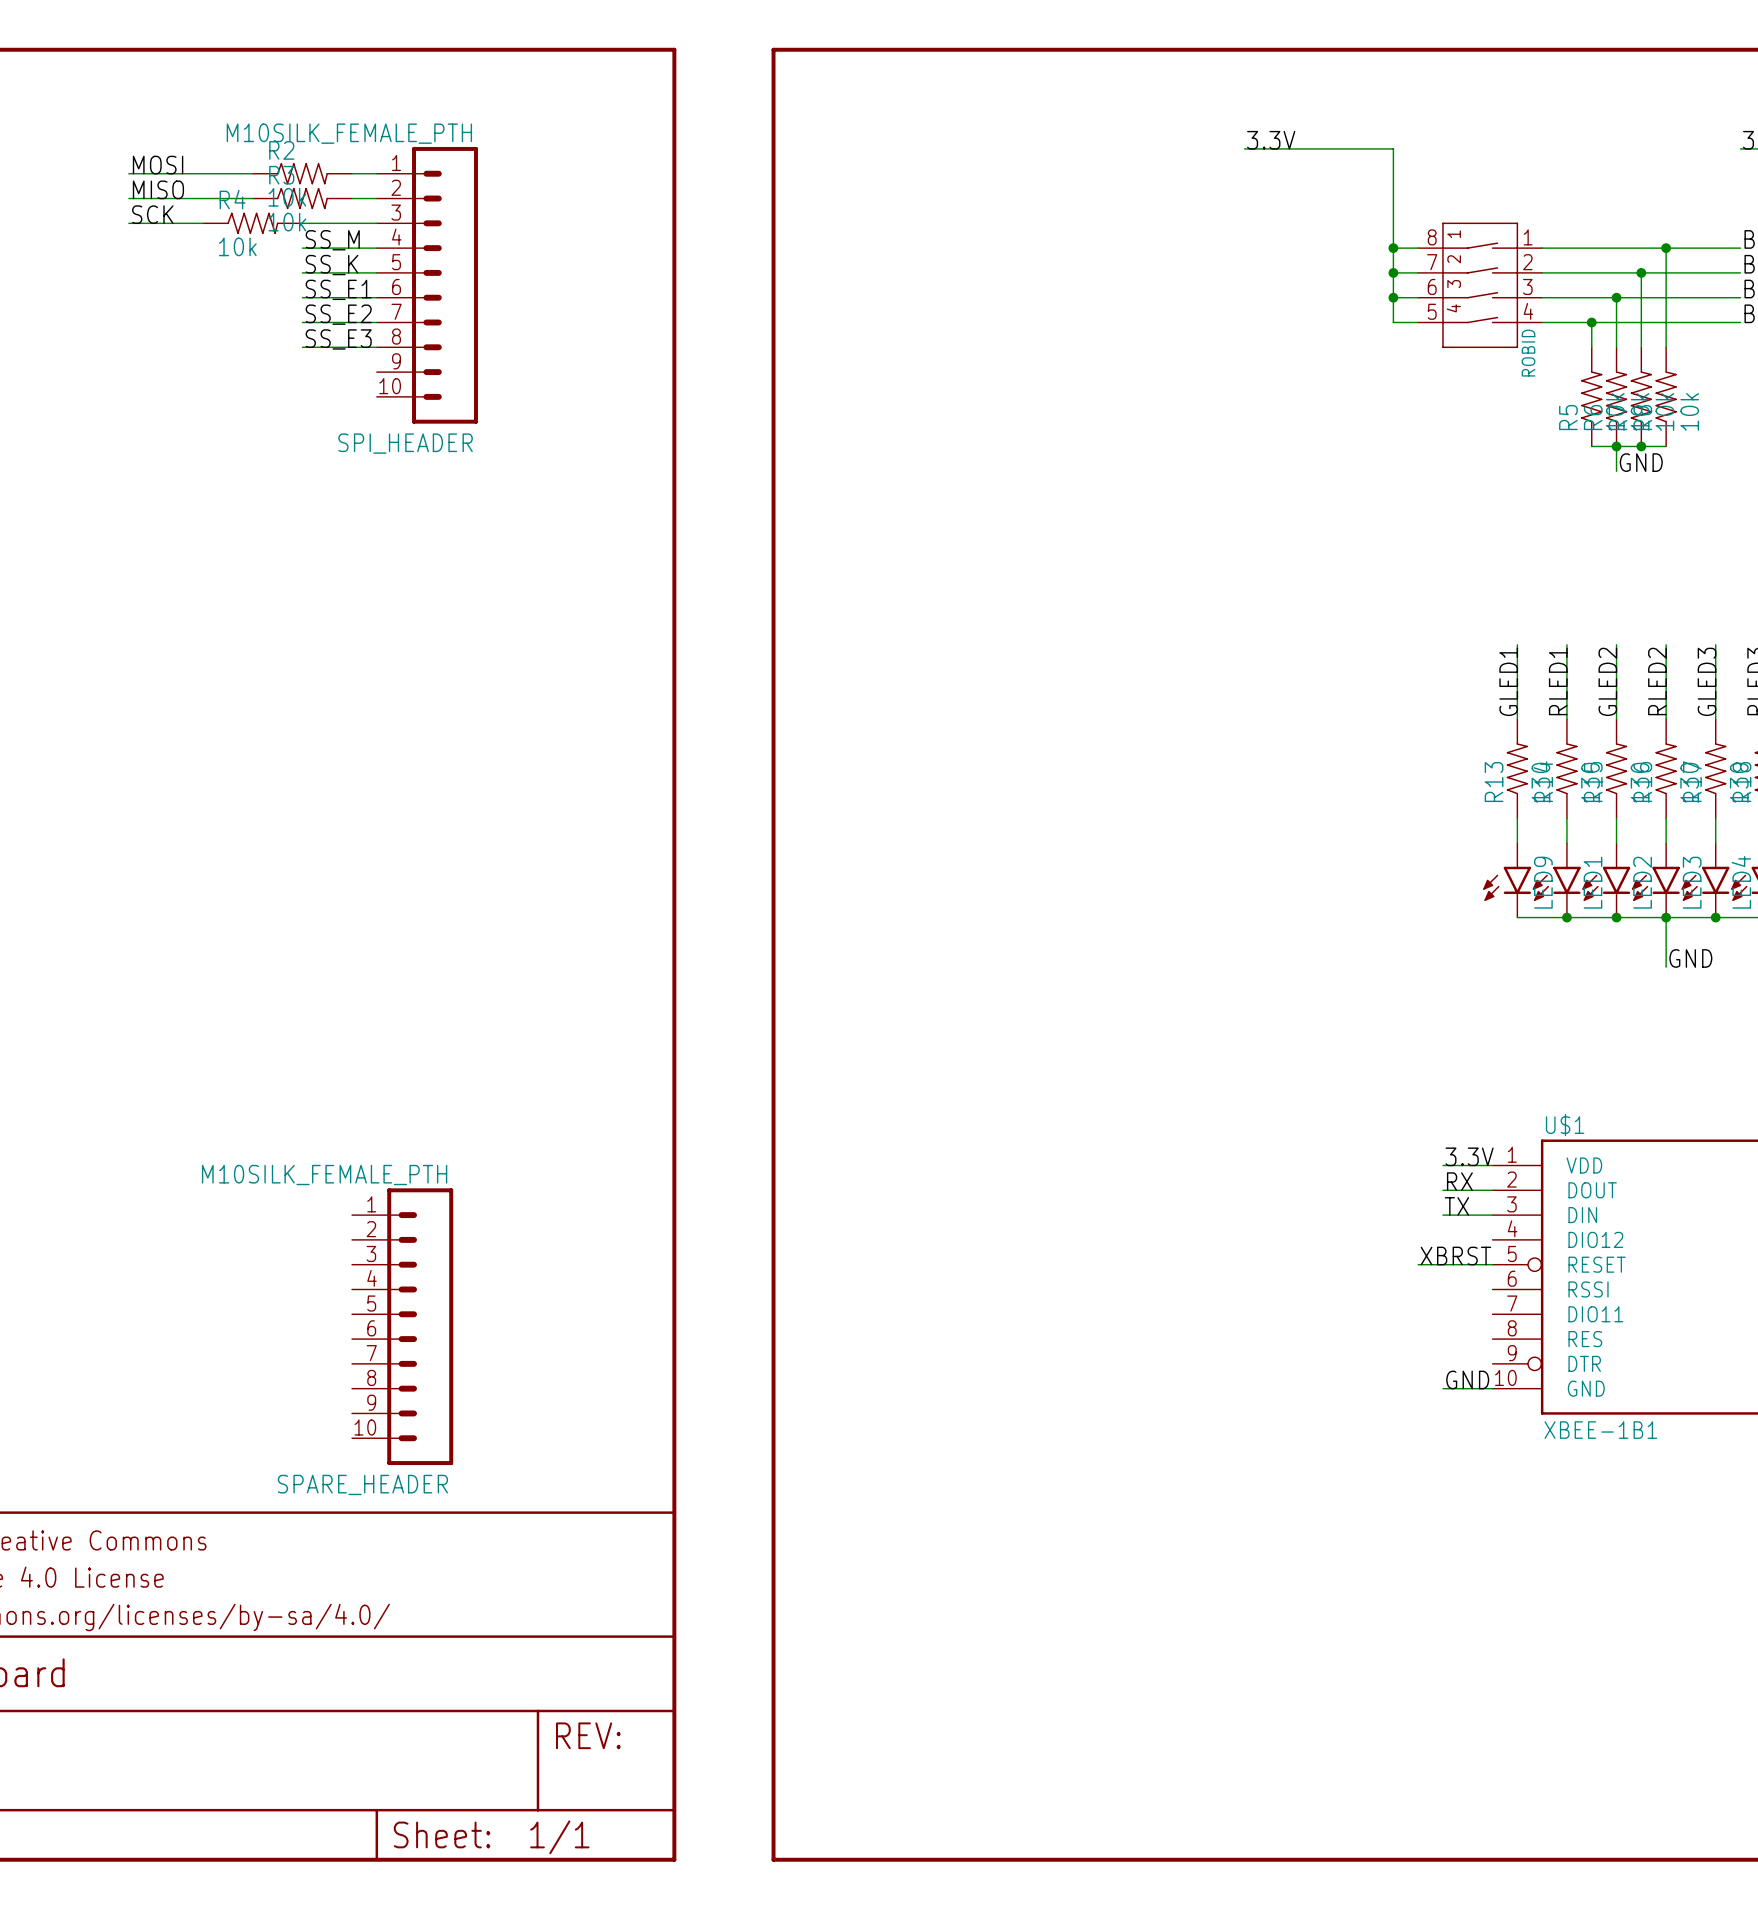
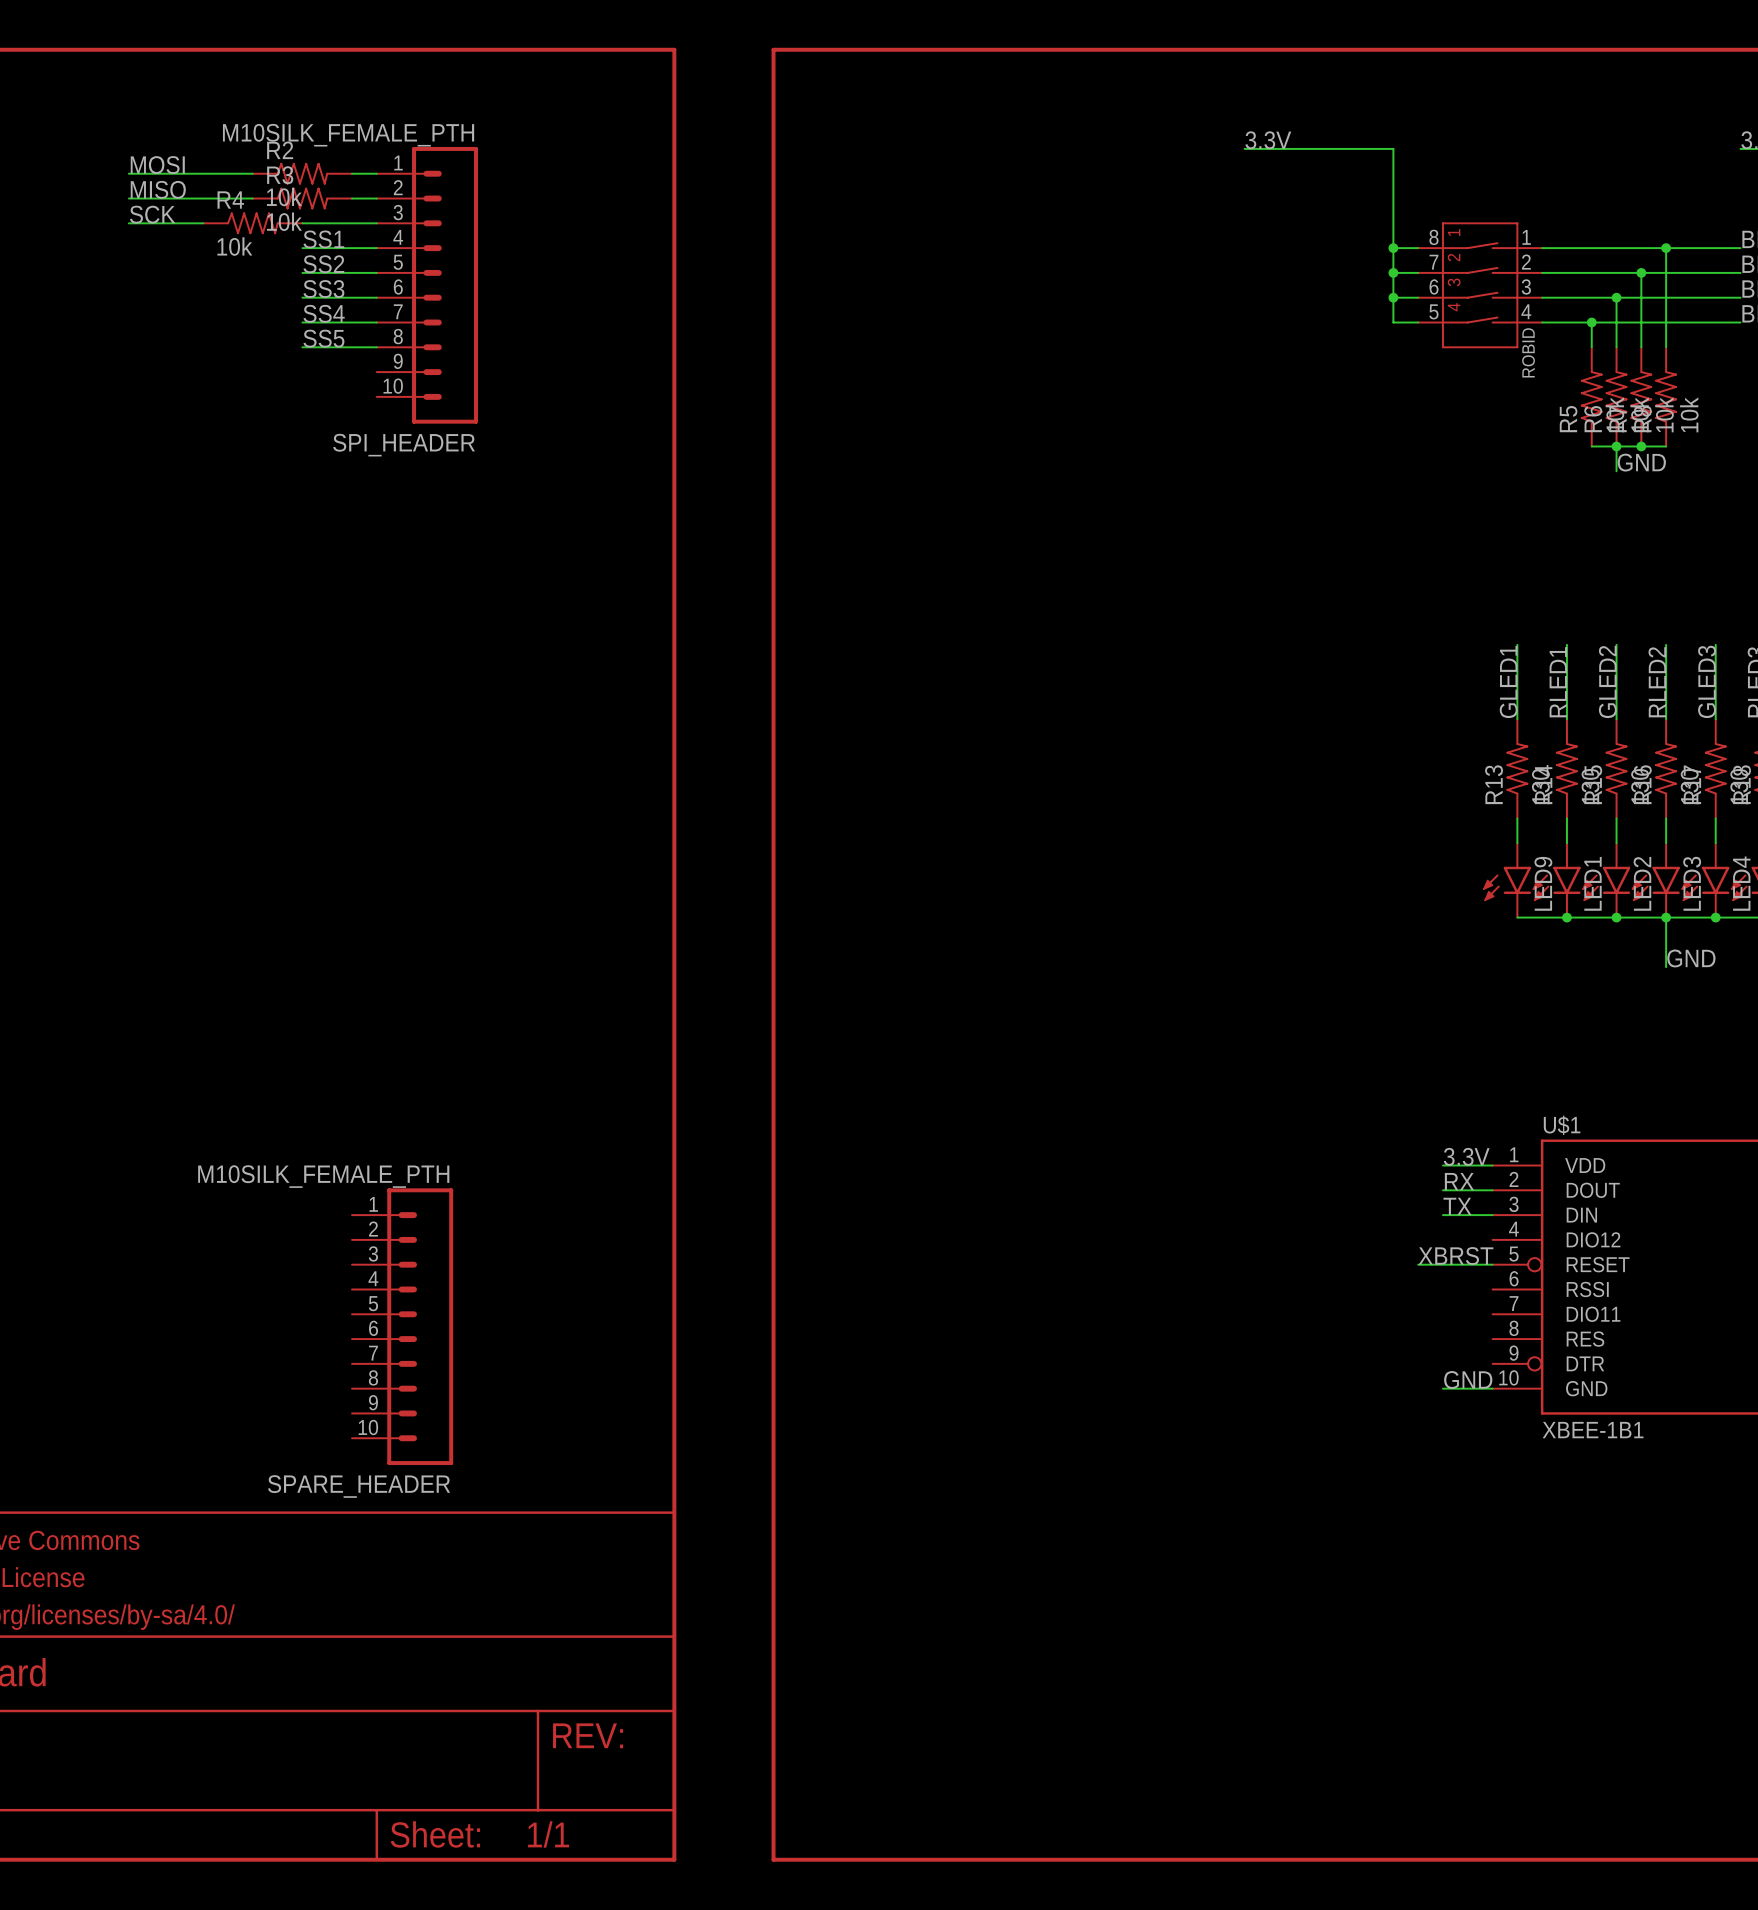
label: SS_M (332, 240) -> SS1 (323, 239)
label: SS_K (331, 265) -> SS2 (323, 264)
label: SS_E1 (338, 289) -> SS3 (323, 289)
label: SS_E2 (338, 314) -> SS4 (324, 313)
label: SS_E3 (338, 339) -> SS5 (323, 338)

